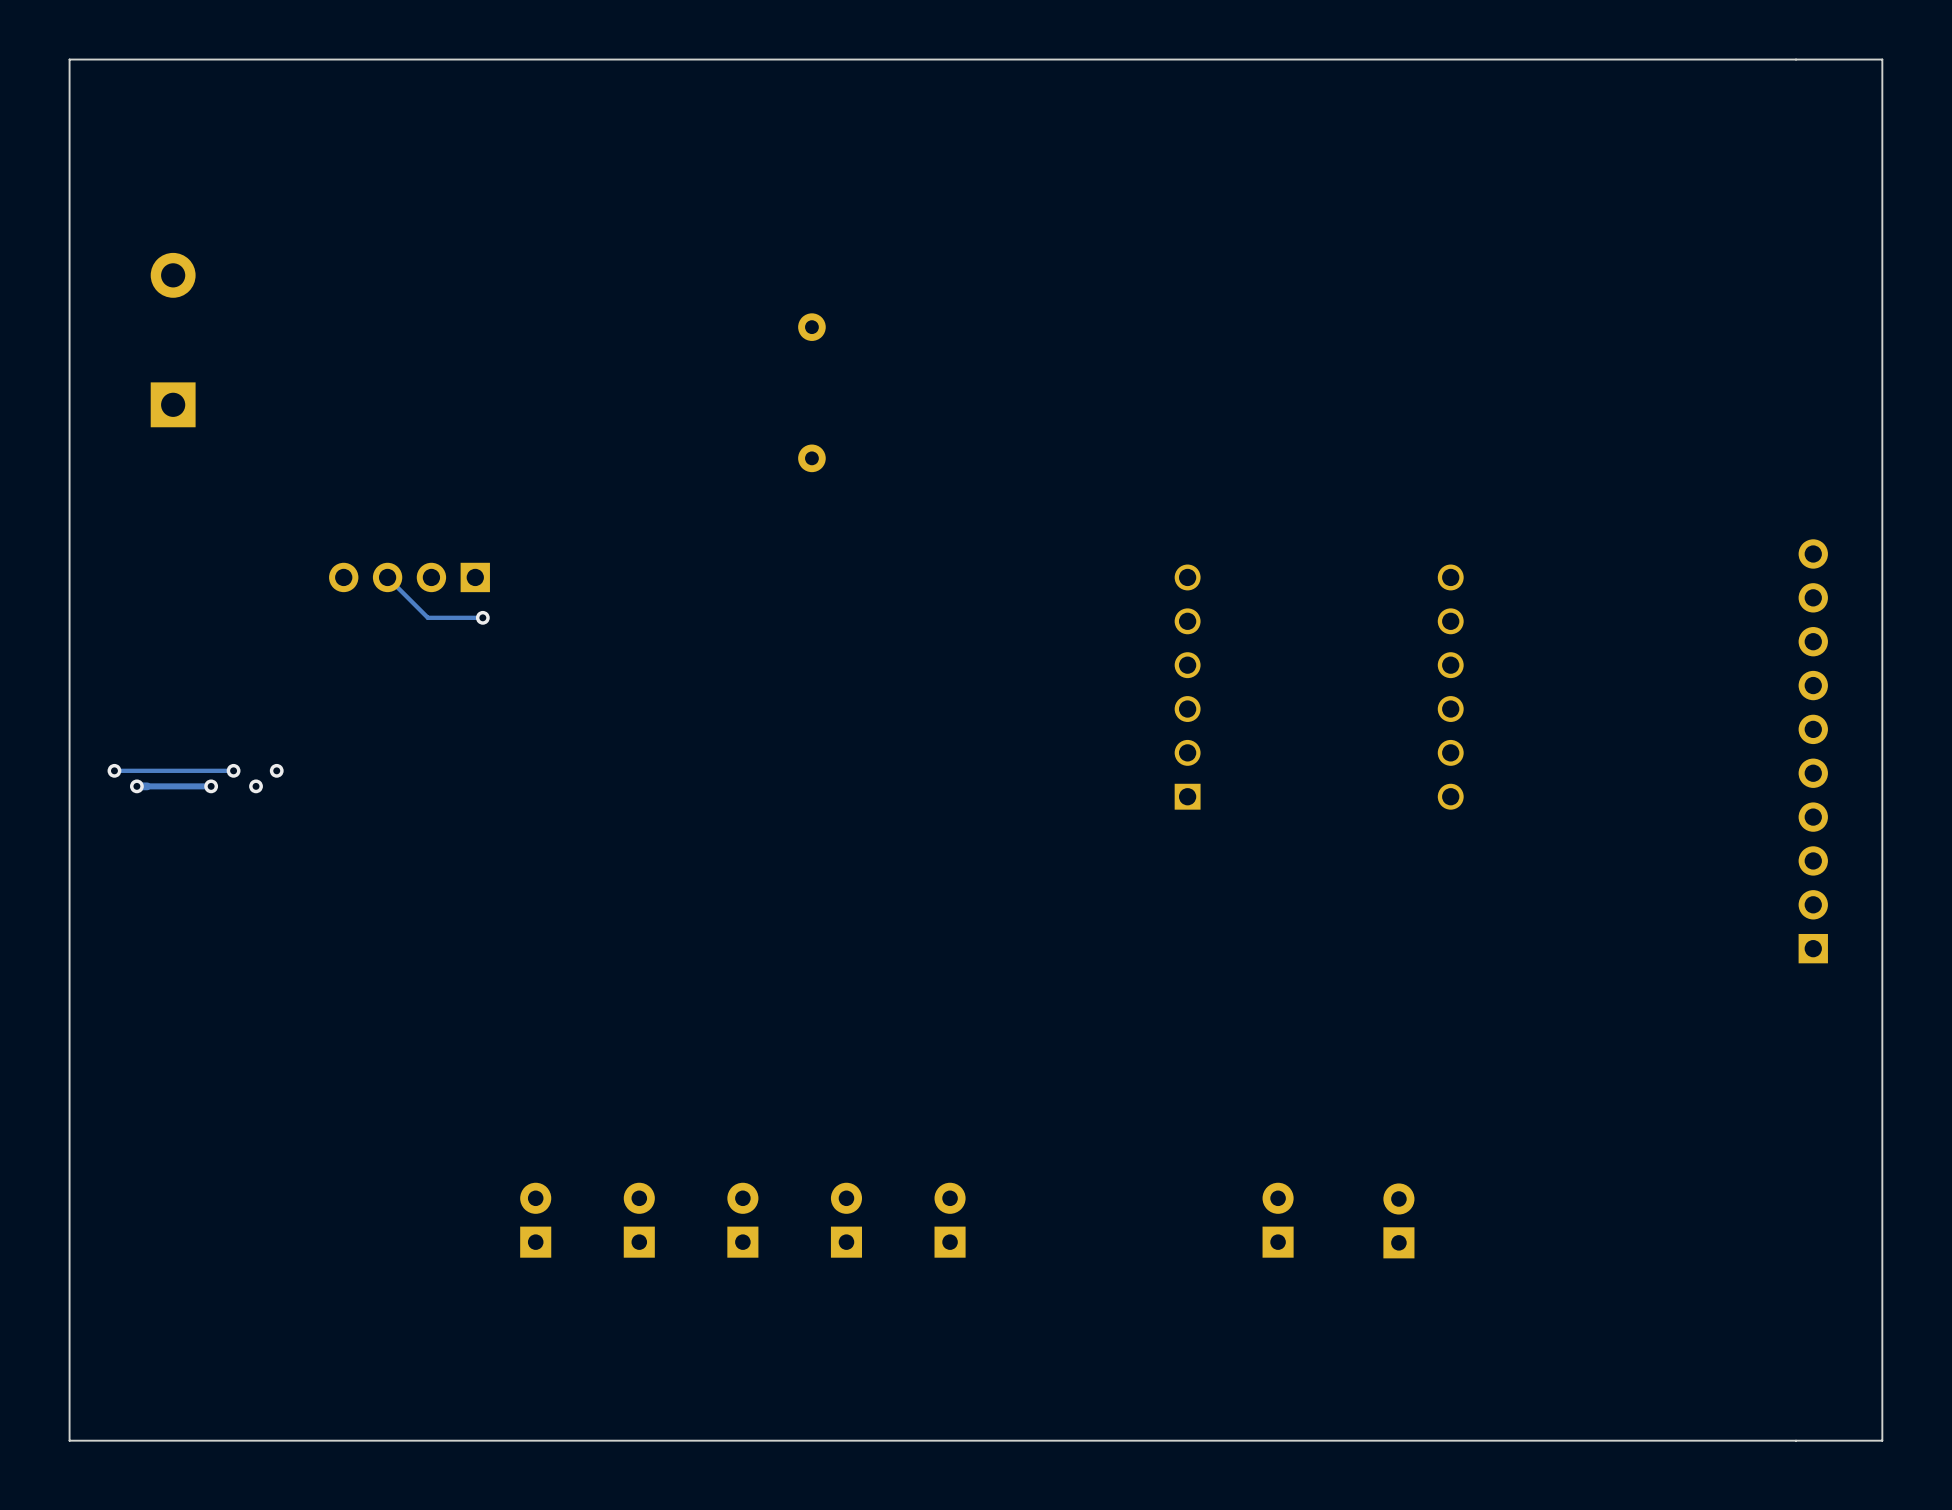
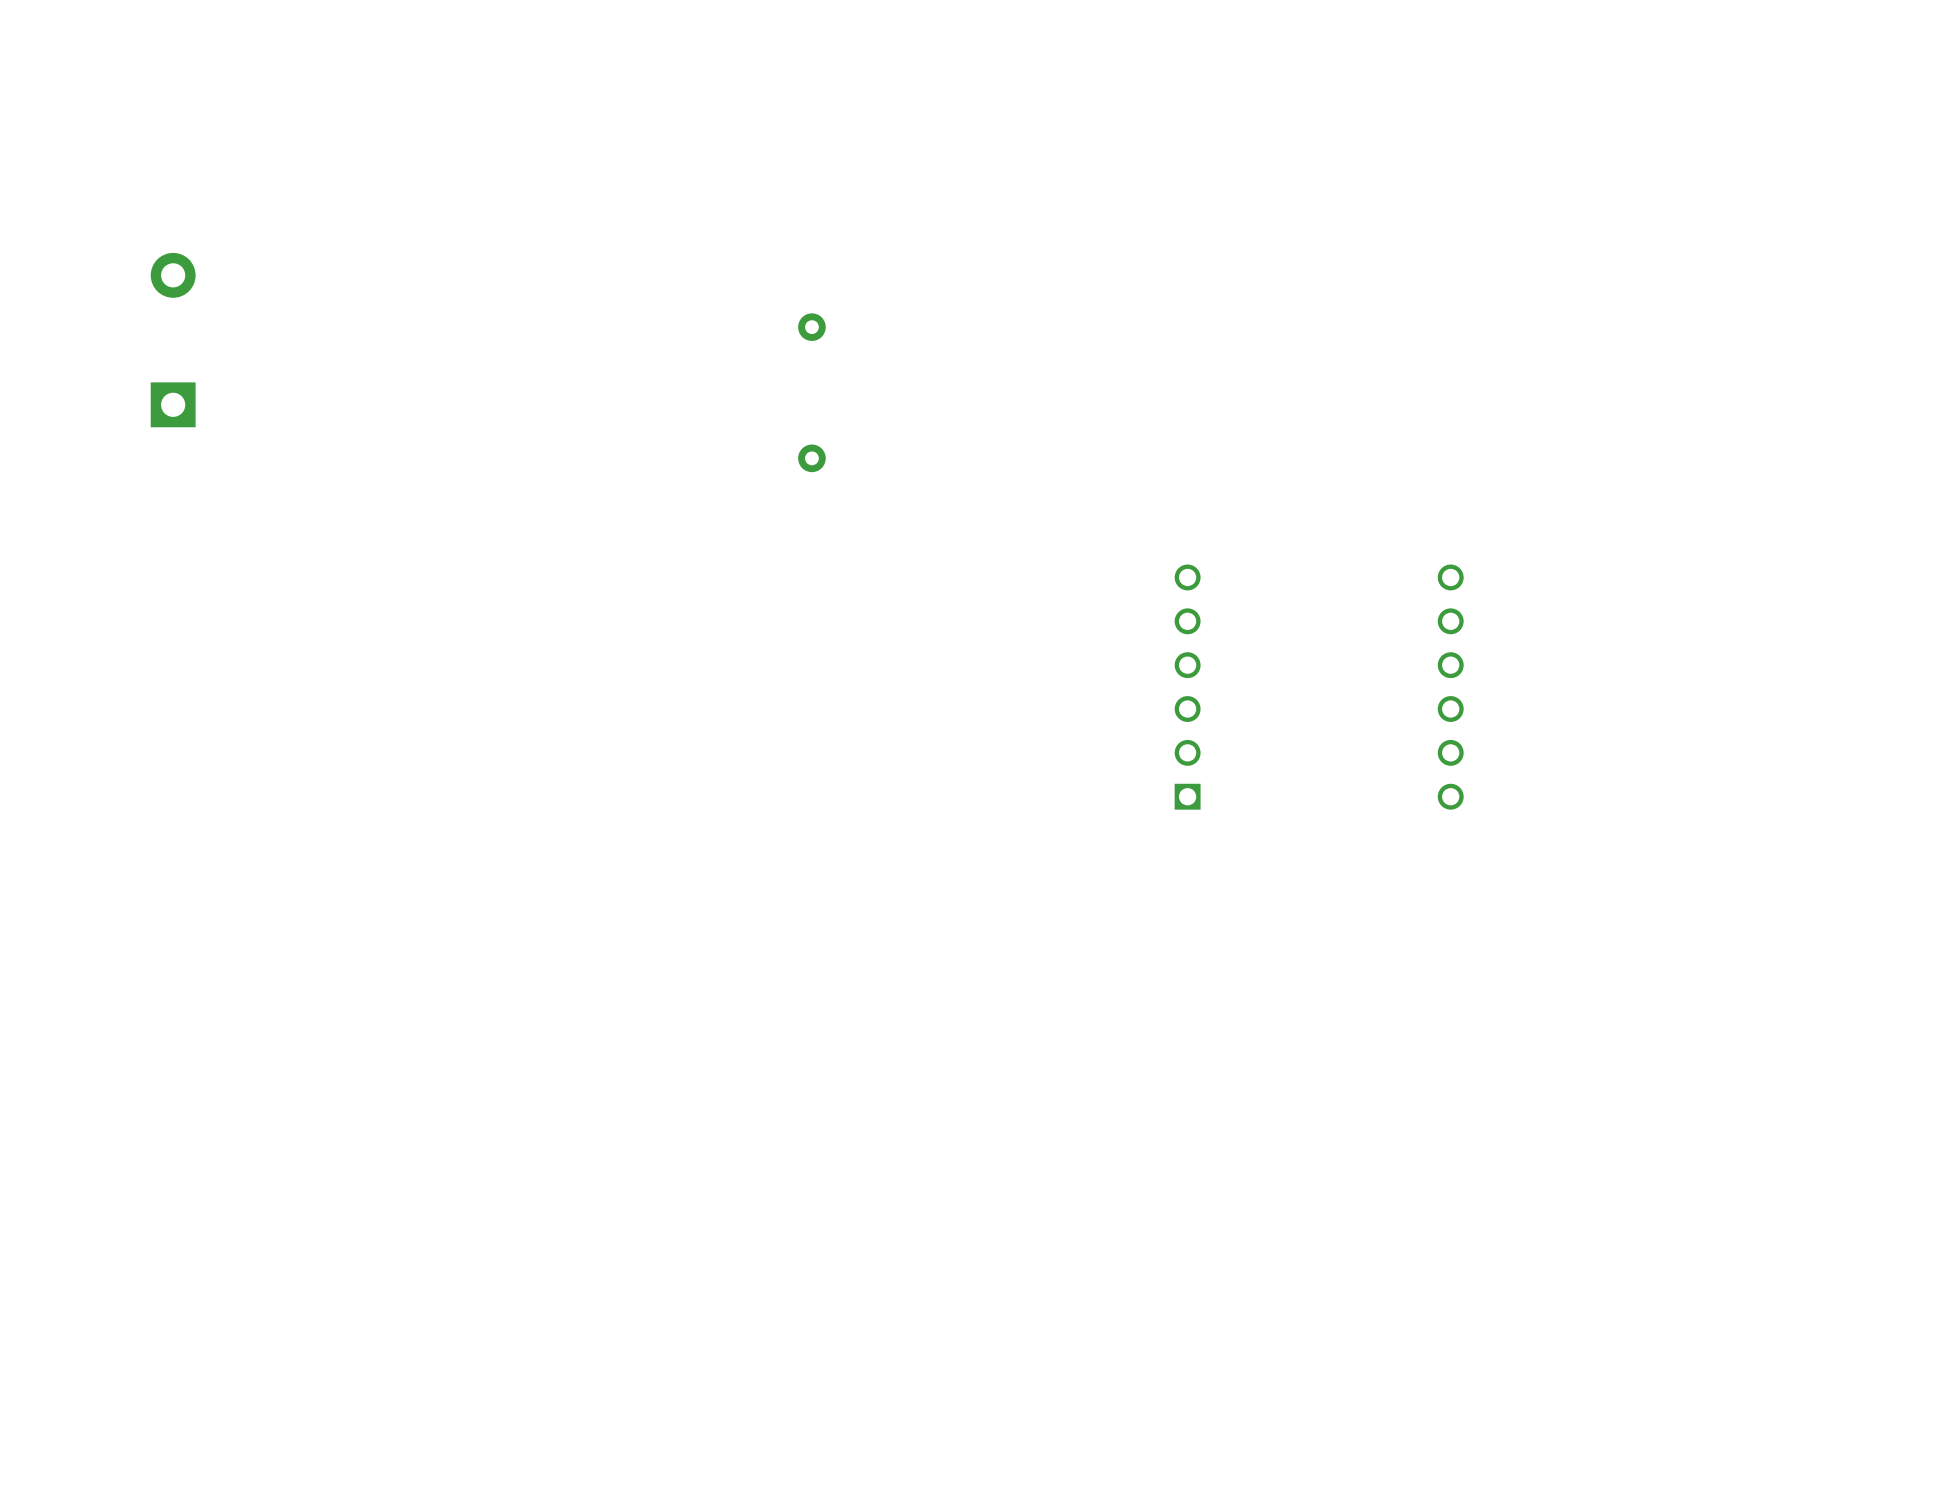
board edge: (1882, 59) (69, 59) (69, 1440) (1882, 1440) (1882, 59) -> none
track: (387, 577) (427, 617) (482, 617) -> none
part: (409, 577) -> none
via: (482, 617) -> none
part: (1813, 751) -> none
via: (114, 770) -> none
track: (233, 770) (114, 770) -> none
via: (233, 770) -> none
via: (276, 770) -> none
via: (136, 786) -> none
track: (211, 786) (136, 786) -> none
via: (211, 786) -> none
via: (256, 786) -> none
part: (535, 1220) -> none
part: (639, 1220) -> none
part: (742, 1220) -> none
part: (846, 1220) -> none
part: (950, 1220) -> none
part: (1278, 1220) -> none
part: (1398, 1220) -> none

